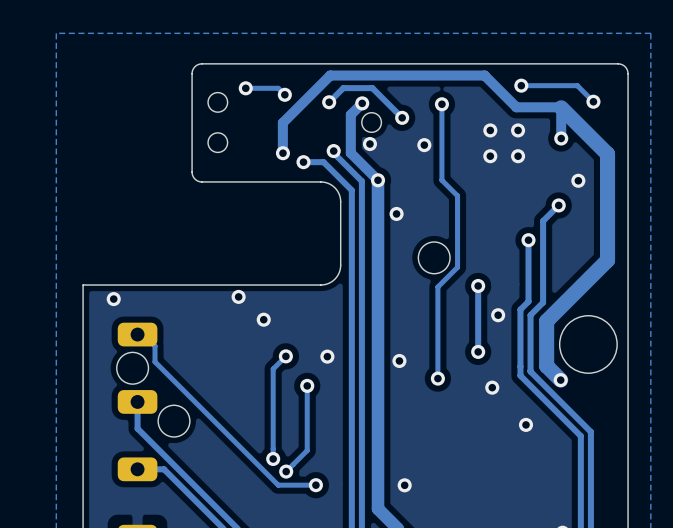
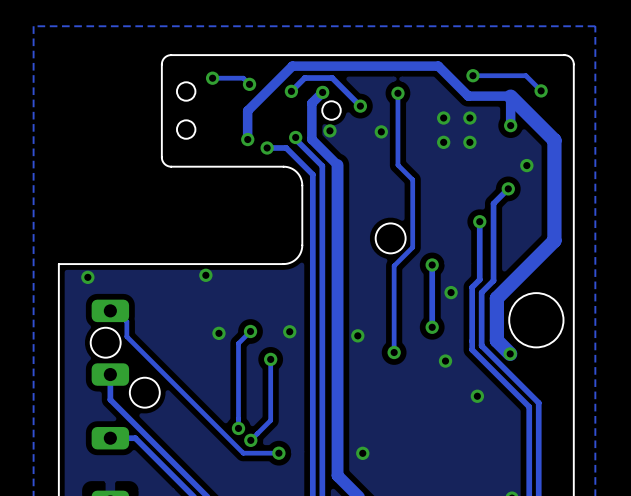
via: (378, 180) -> none
via: (396, 213) -> none
via position: (263, 319) -> (218, 333)

